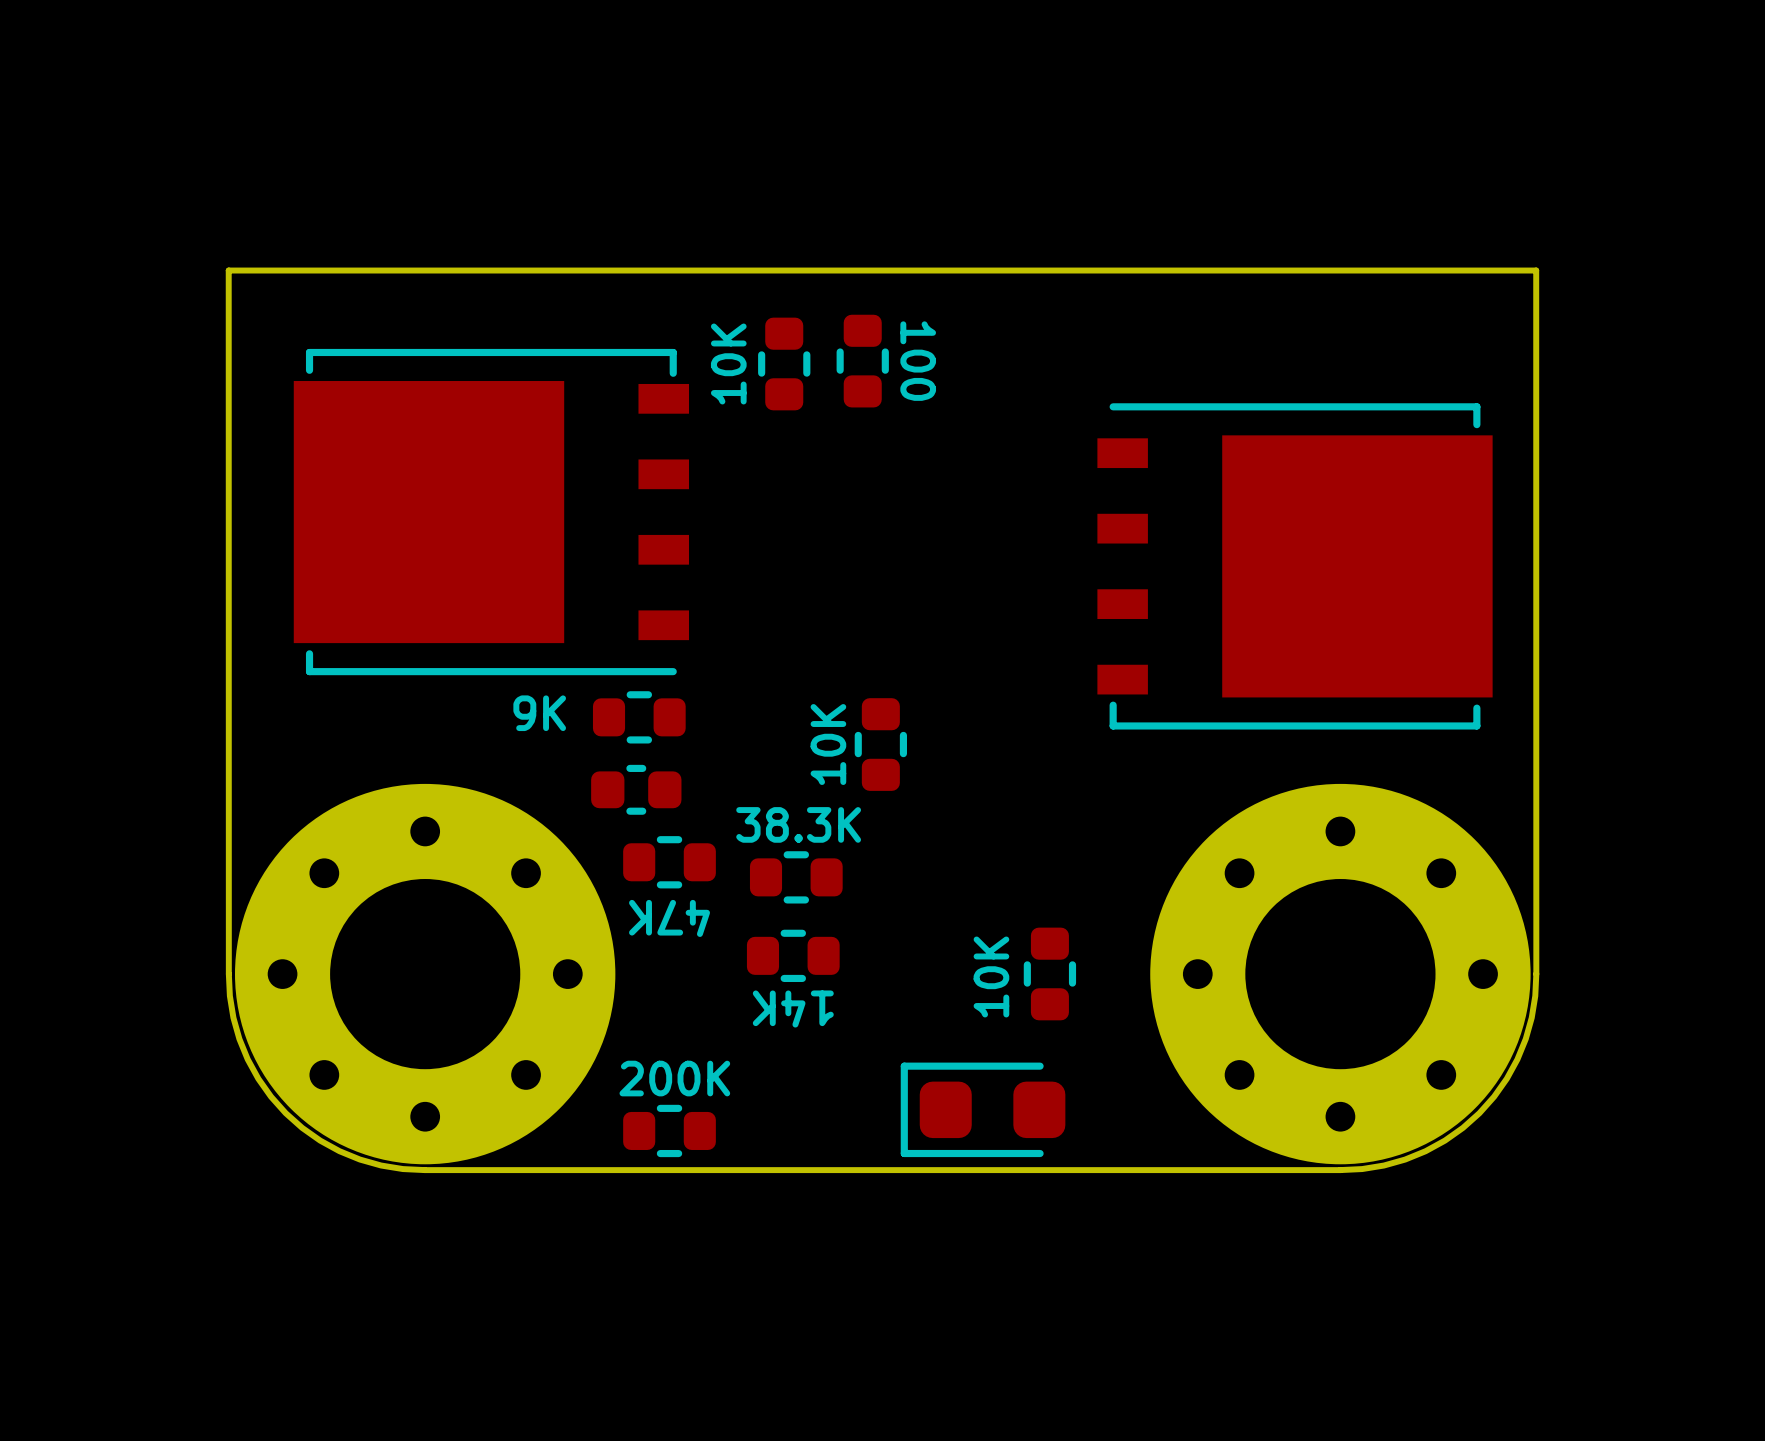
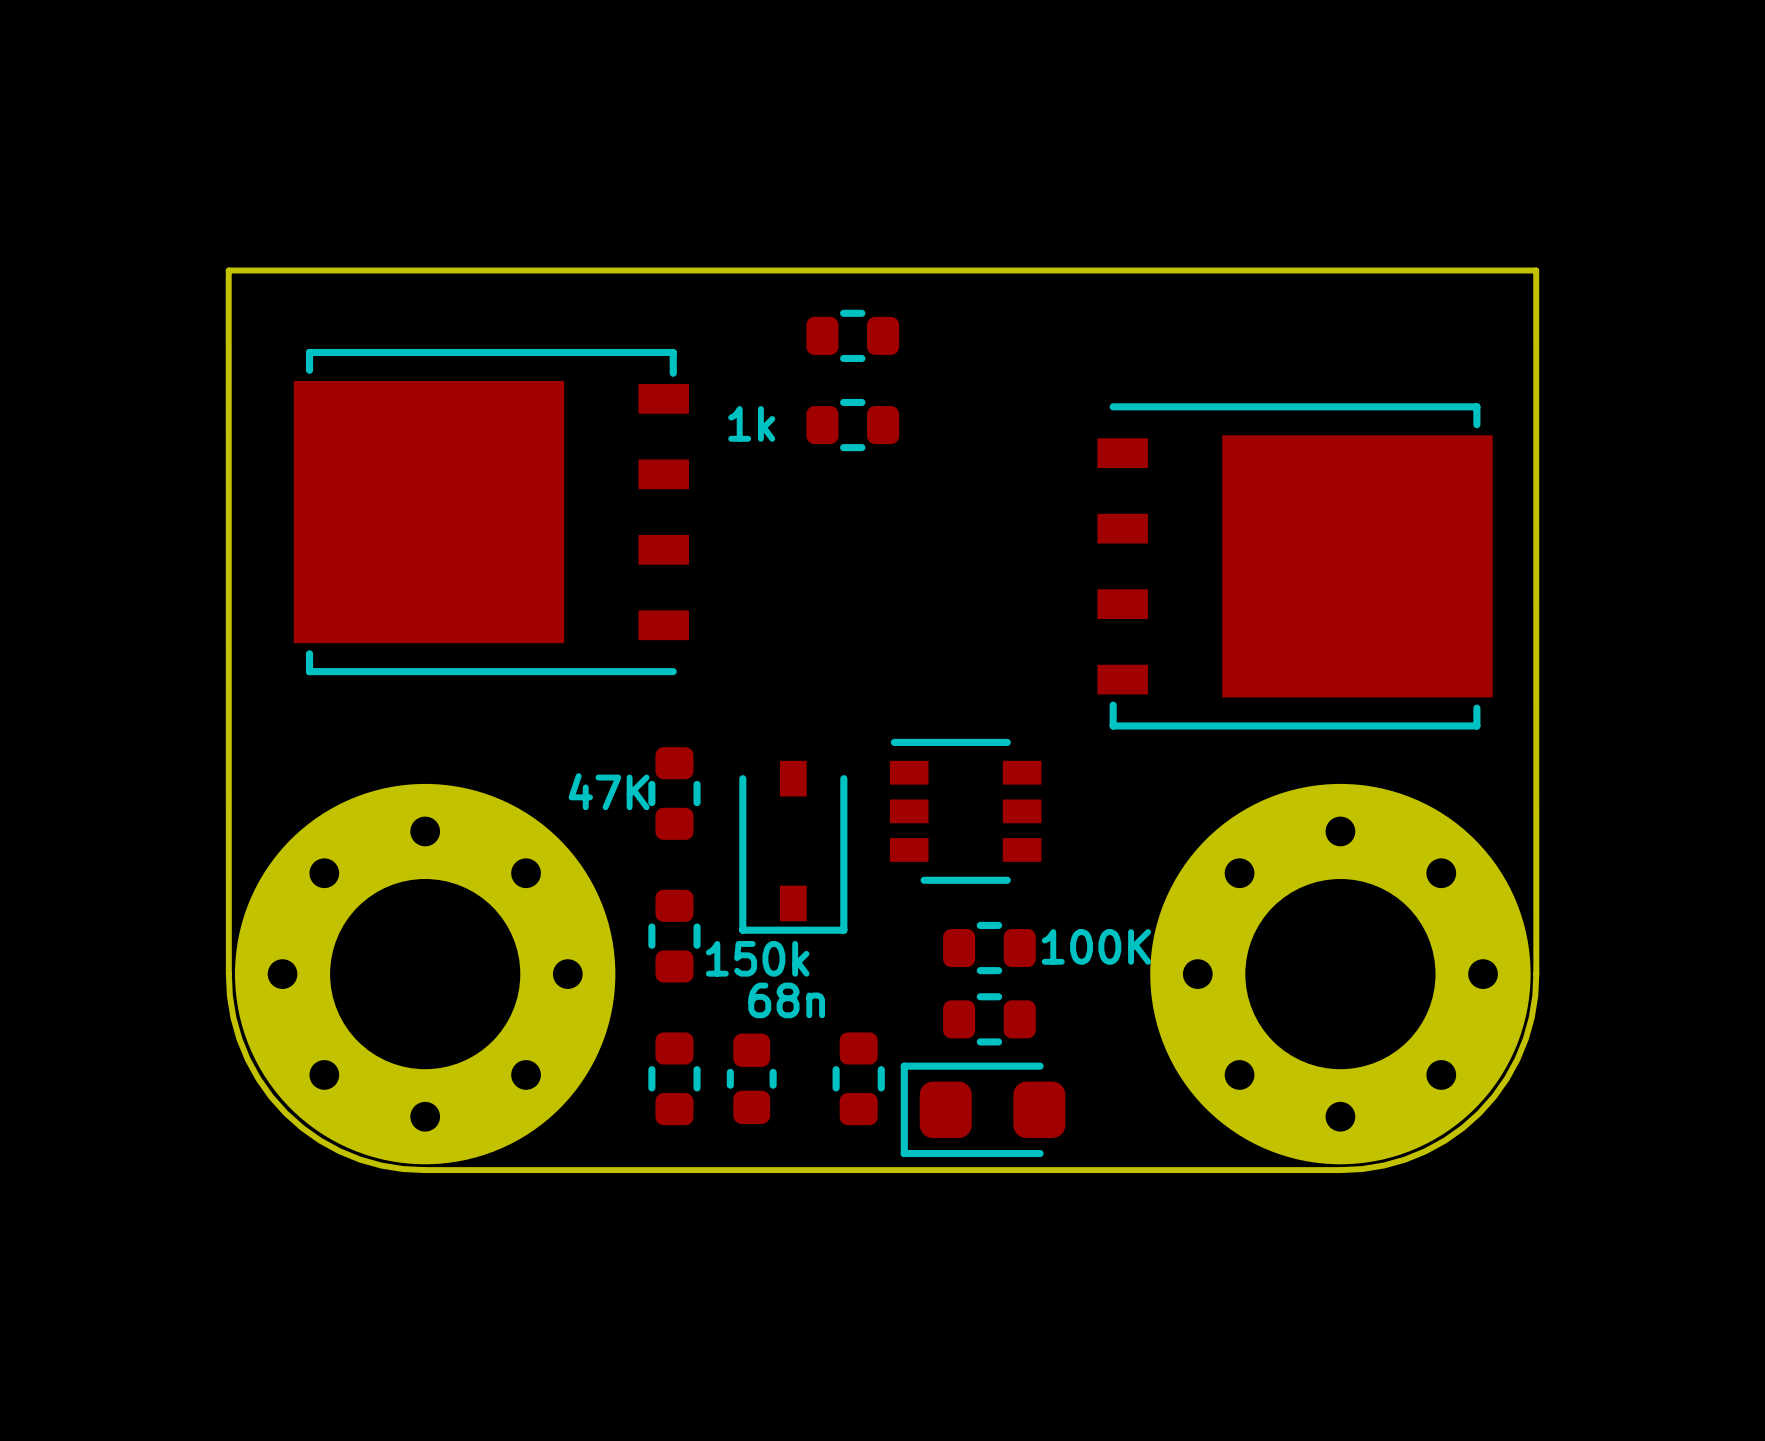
part footprint: [836, 314, 889, 408] -> [806, 309, 900, 363]
part: (784, 364) -> none
part: none -> (852, 425)
part: (639, 717) -> none
part: (880, 744) -> none
part: (636, 789) -> none
part: none -> (674, 793)
part: none -> (965, 811)
part footprint: [749, 851, 843, 904] -> [739, 760, 848, 934]
part: (669, 862) -> none
part: none -> (674, 936)
part: none -> (989, 948)
part: (793, 955) -> none
part: (1049, 973) -> none
part: none -> (989, 1019)
part: none -> (674, 1078)
part: none -> (751, 1078)
part: none -> (858, 1078)
part: (669, 1130) -> none

